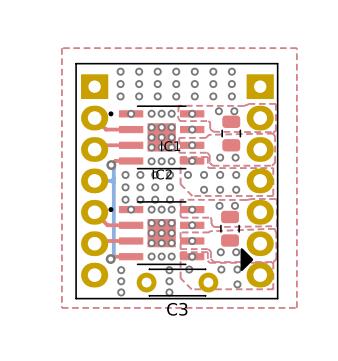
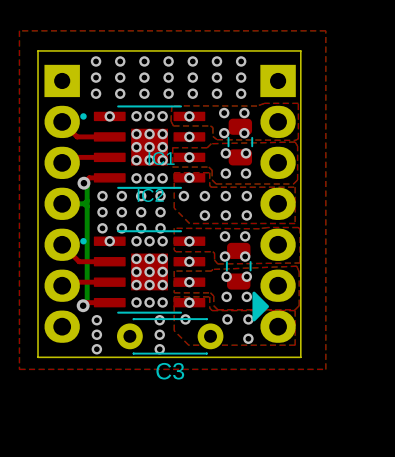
via: none -> (224, 133)
via: none -> (244, 133)
via: none -> (225, 153)
via: none -> (245, 153)
via: none -> (225, 256)
via: none -> (245, 256)
via: none -> (226, 276)
via: none -> (246, 276)

